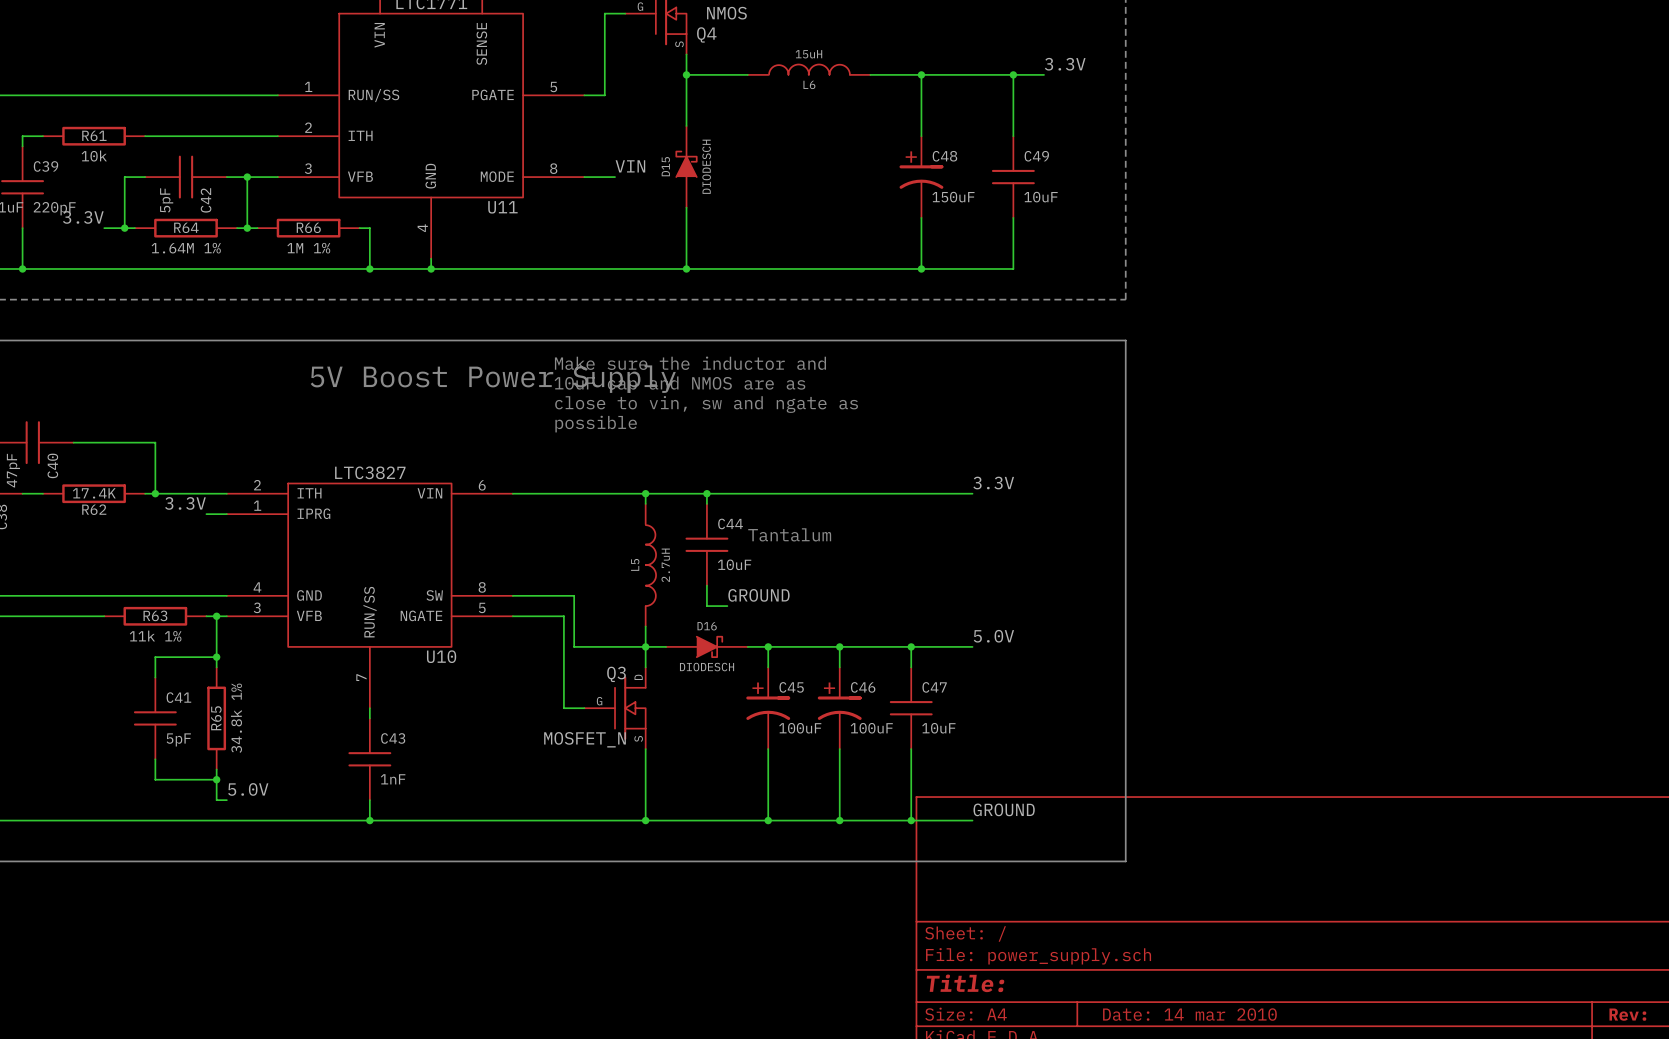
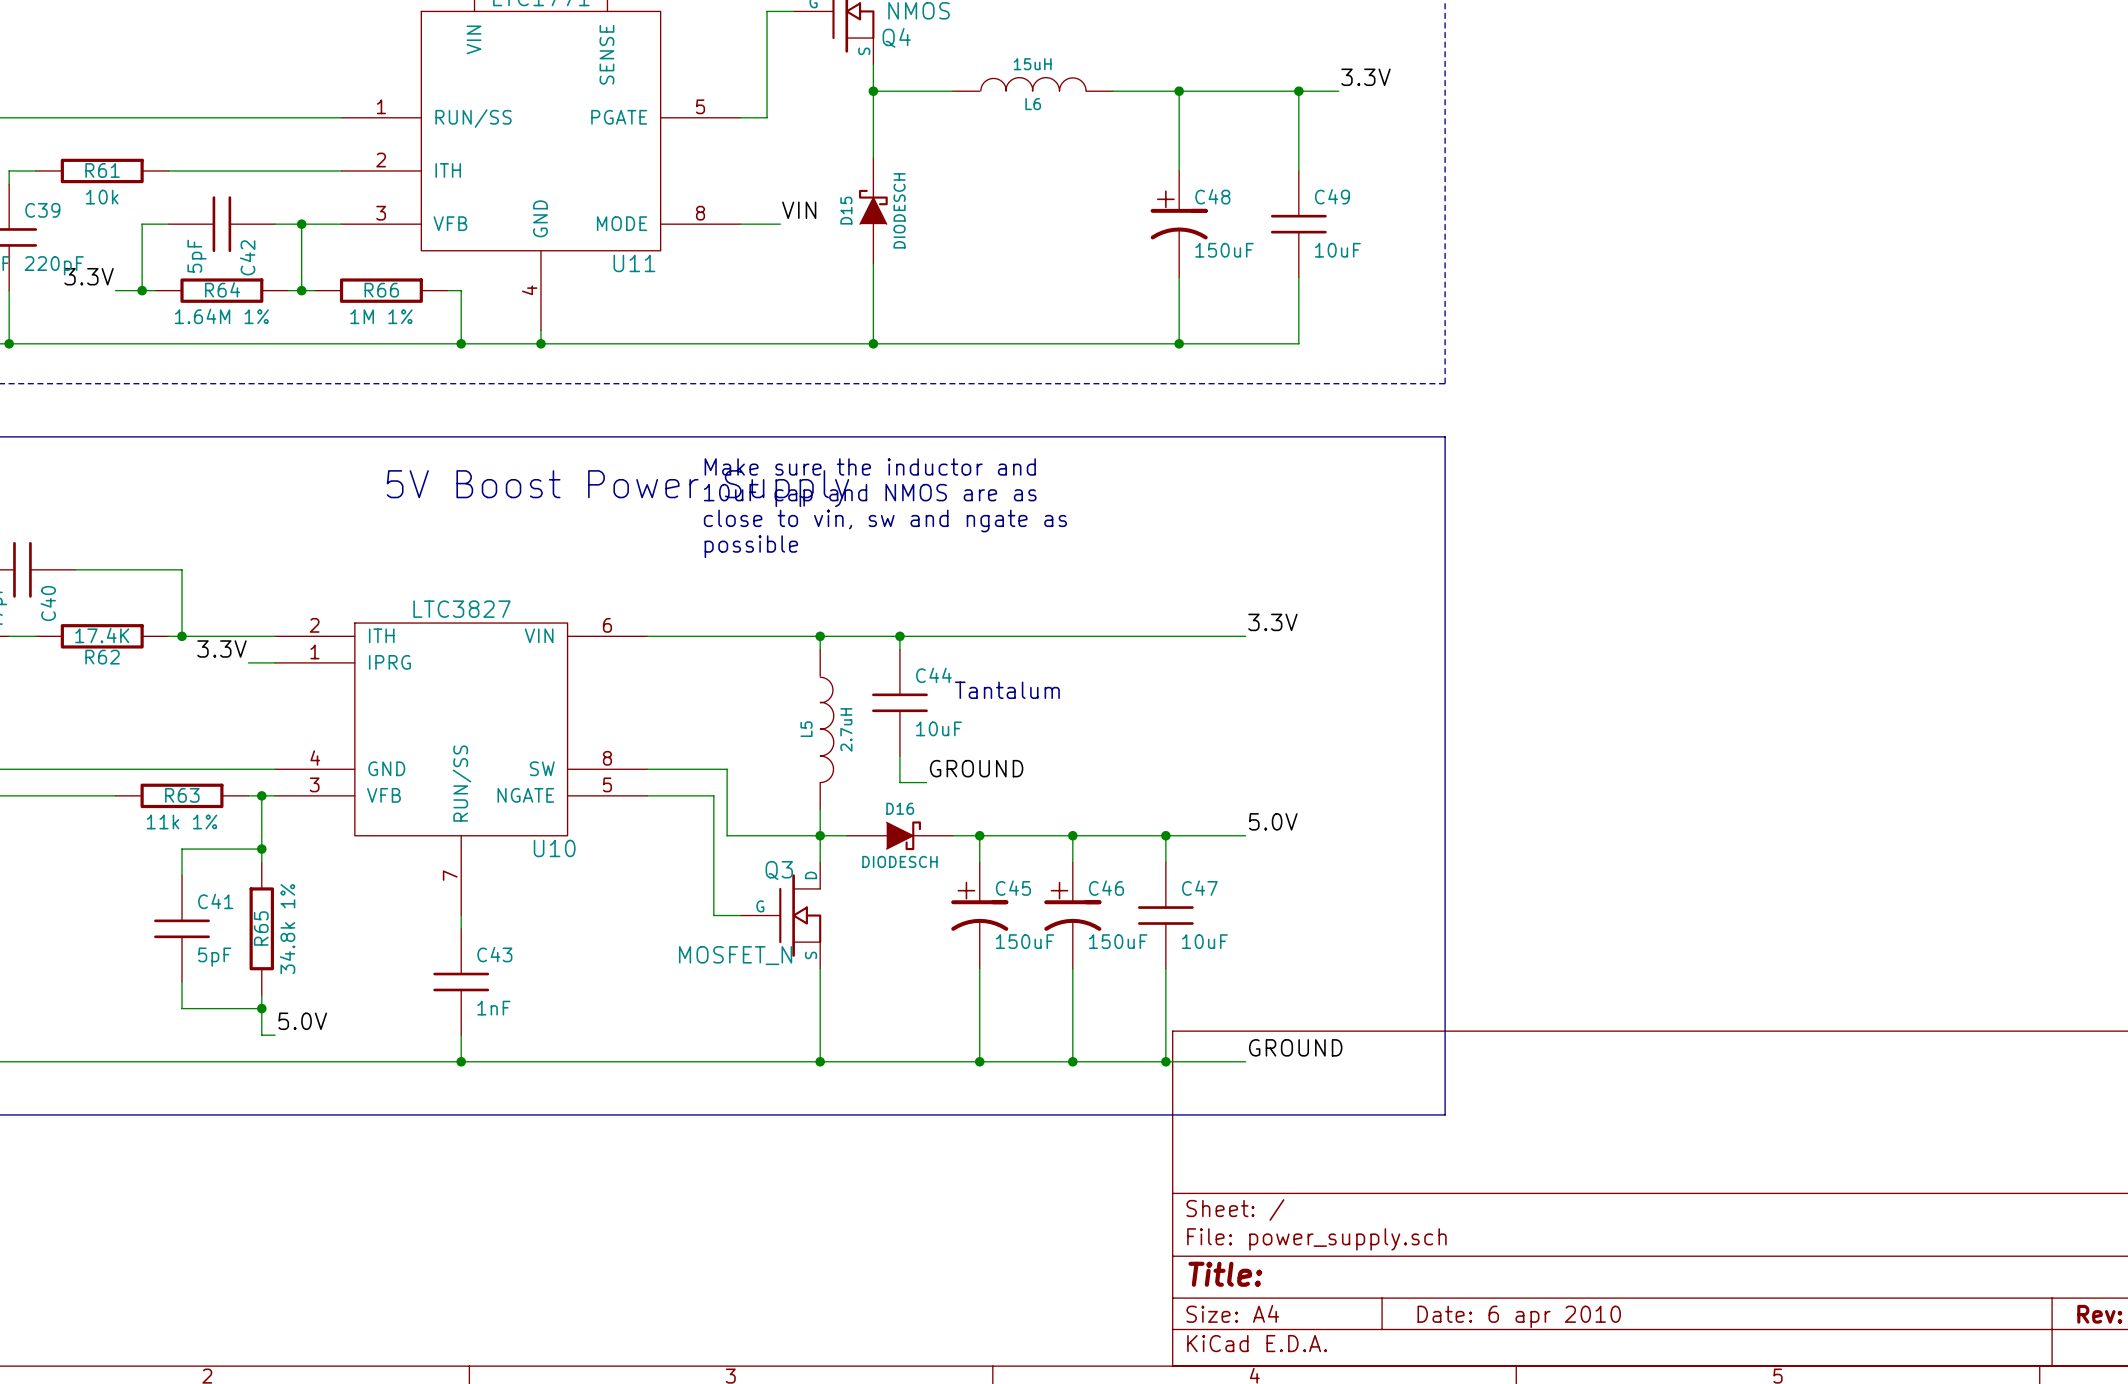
C45 value: 100uF (800, 728) -> 150uF (1025, 941)
C46 value: 100uF (871, 728) -> 150uF (1118, 941)
title block: Date: 14 mar 2010 (1189, 1014) -> Date: 6 apr 2010 (1519, 1316)

